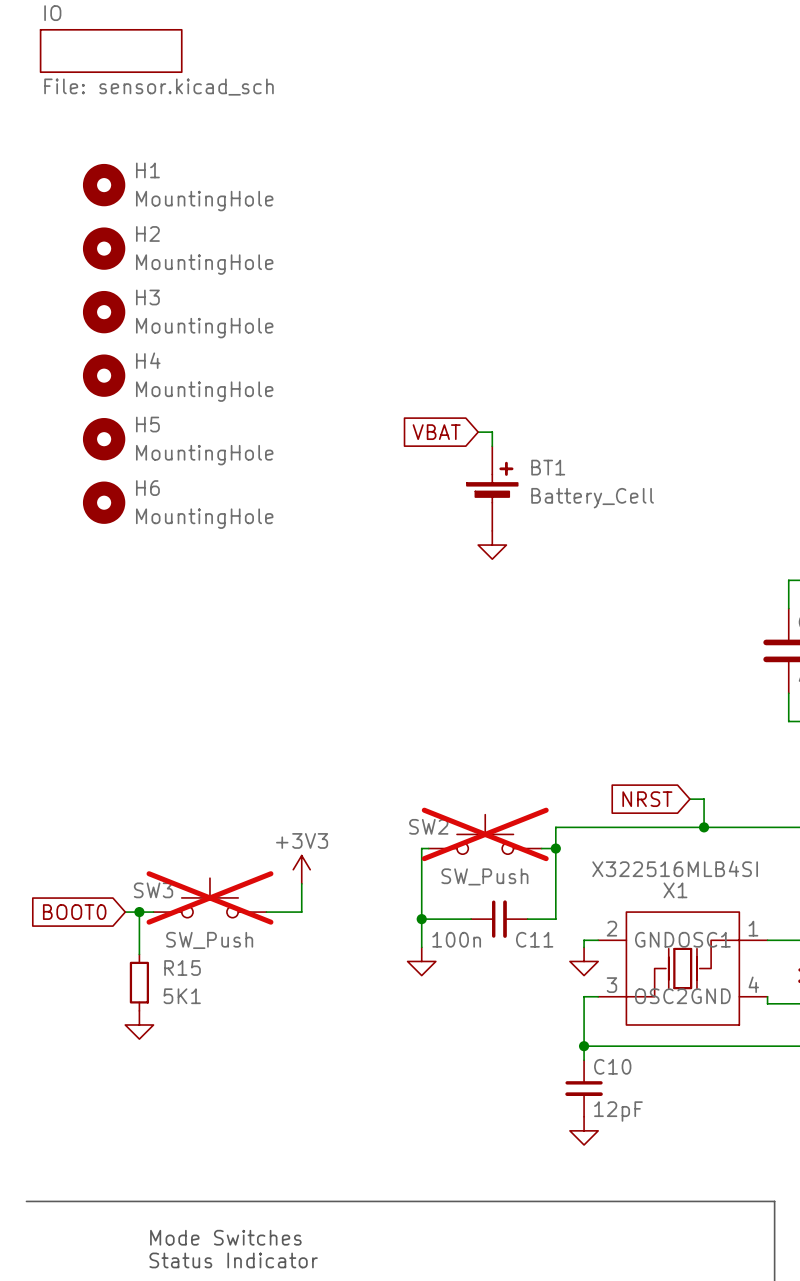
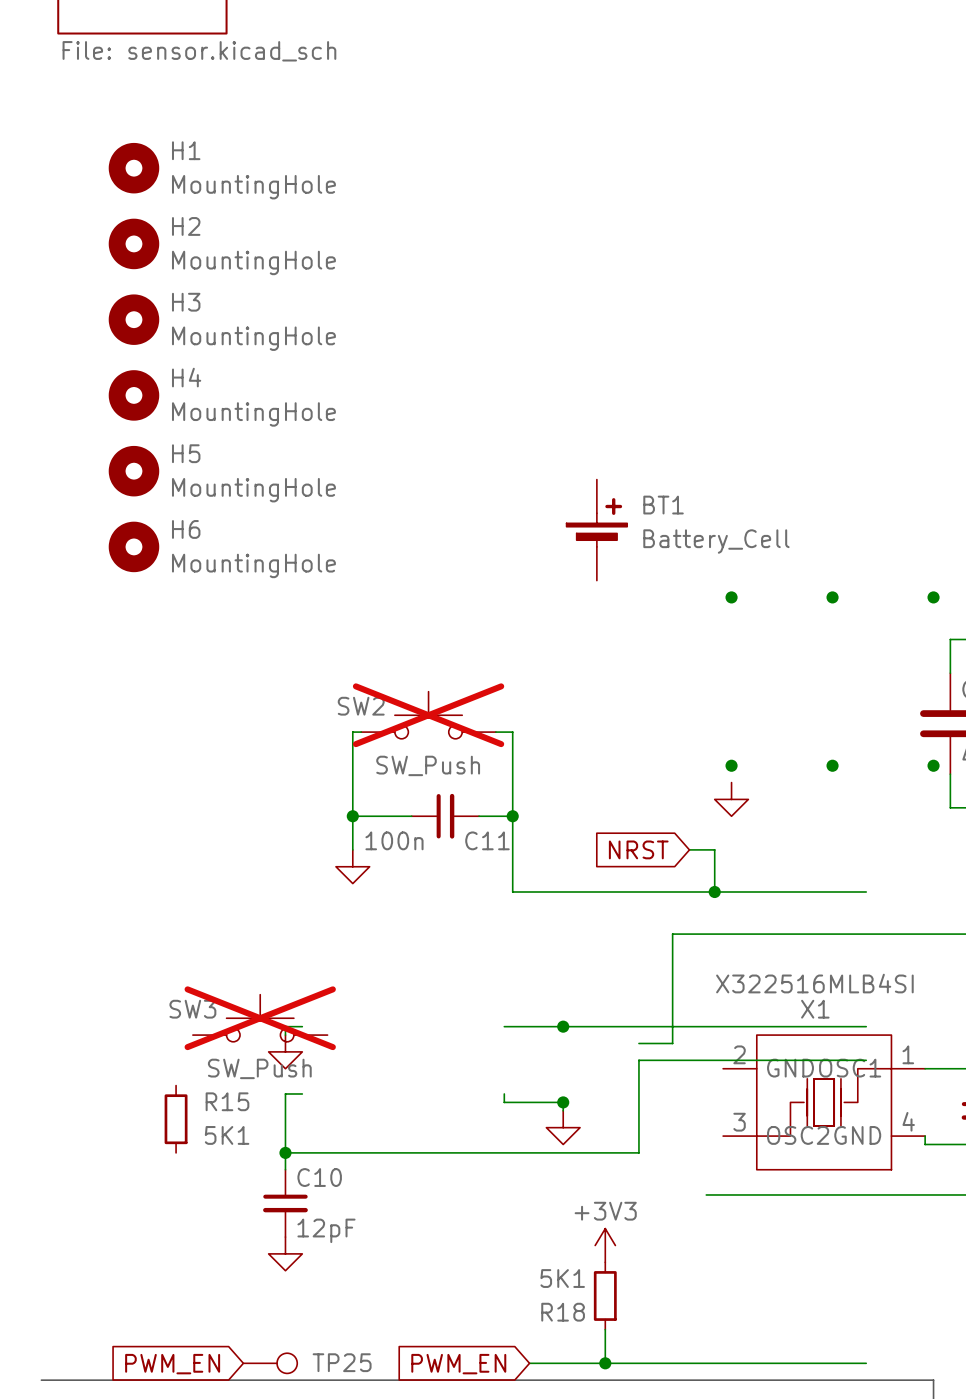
global label: VBAT (436, 432) -> none
wire: (478, 432) (492, 432) (492, 446) -> none
power symbol: (492, 545) -> none
junction: none -> (731, 597)
junction: none -> (832, 597)
junction: none -> (933, 597)
wire: none -> (495, 732) (512, 732) (512, 891) (866, 891)
junction: none -> (731, 765)
junction: none -> (832, 765)
junction: none -> (933, 765)
power symbol: none -> (731, 799)
junction: none -> (352, 816)
wire: none -> (479, 816) (512, 816)
junction: none -> (512, 816)
wire: none -> (689, 849) (714, 849) (714, 891)
power symbol: none -> (352, 866)
junction: none -> (714, 891)
global label position: NRST (647, 799) -> NRST (638, 849)
wire: (689, 799) (704, 799) (704, 827) -> none
junction: (704, 827) -> none
SW2 position: (485, 834) -> (428, 715)
wire: (428, 848) (421, 848) (421, 947) -> (361, 732) (352, 732) (352, 849)
wire: (541, 848) (555, 848) -> none
junction: (555, 848) -> none
power symbol: +3V3 (301, 869) -> none
wire: (301, 883) (301, 912) (266, 912) -> none
wire: none -> (302, 1026) (285, 1026) (285, 1035)
wire: none -> (504, 1026) (866, 1026)
junction: none -> (563, 1026)
global label: BOOT0 (74, 912) -> none
wire: (125, 912) (153, 912) -> none
wire: (139, 912) (139, 954) -> none
junction: (139, 912) -> none
wire: (421, 919) (471, 919) -> (352, 816) (411, 816)
junction: (421, 919) -> none
C11 position: (499, 919) -> (445, 816)
power symbol: none -> (285, 1051)
wire: none -> (866, 1060) (638, 1060) (638, 1152) (285, 1152)
wire: (598, 940) (584, 940) (584, 947) -> none
wire: none -> (302, 1093) (285, 1093) (285, 1169)
wire: none -> (504, 1093) (504, 1102) (563, 1102) (563, 1110)
power symbol position: (421, 961) -> (563, 1127)
power symbol: (584, 961) -> none
junction: none -> (563, 1102)
wire: (598, 996) (584, 996) (584, 1060) -> none
junction: none -> (285, 1152)
power symbol: (139, 1024) -> none
junction: (584, 1046) -> none
power symbol: none -> +3V3 (605, 1245)
C10 position: (584, 1088) -> (285, 1203)
power symbol: none -> (285, 1253)
R18: none -> 5K1 (605, 1295)
power symbol: (584, 1130) -> none
wire: none -> (605, 1329) (605, 1363)
TP25: none -> (270, 1363)
wire: none -> (529, 1363) (866, 1363)
junction: none -> (605, 1363)
global label: none -> PWM_EN (172, 1364)
global label: none -> PWM_EN (458, 1364)

